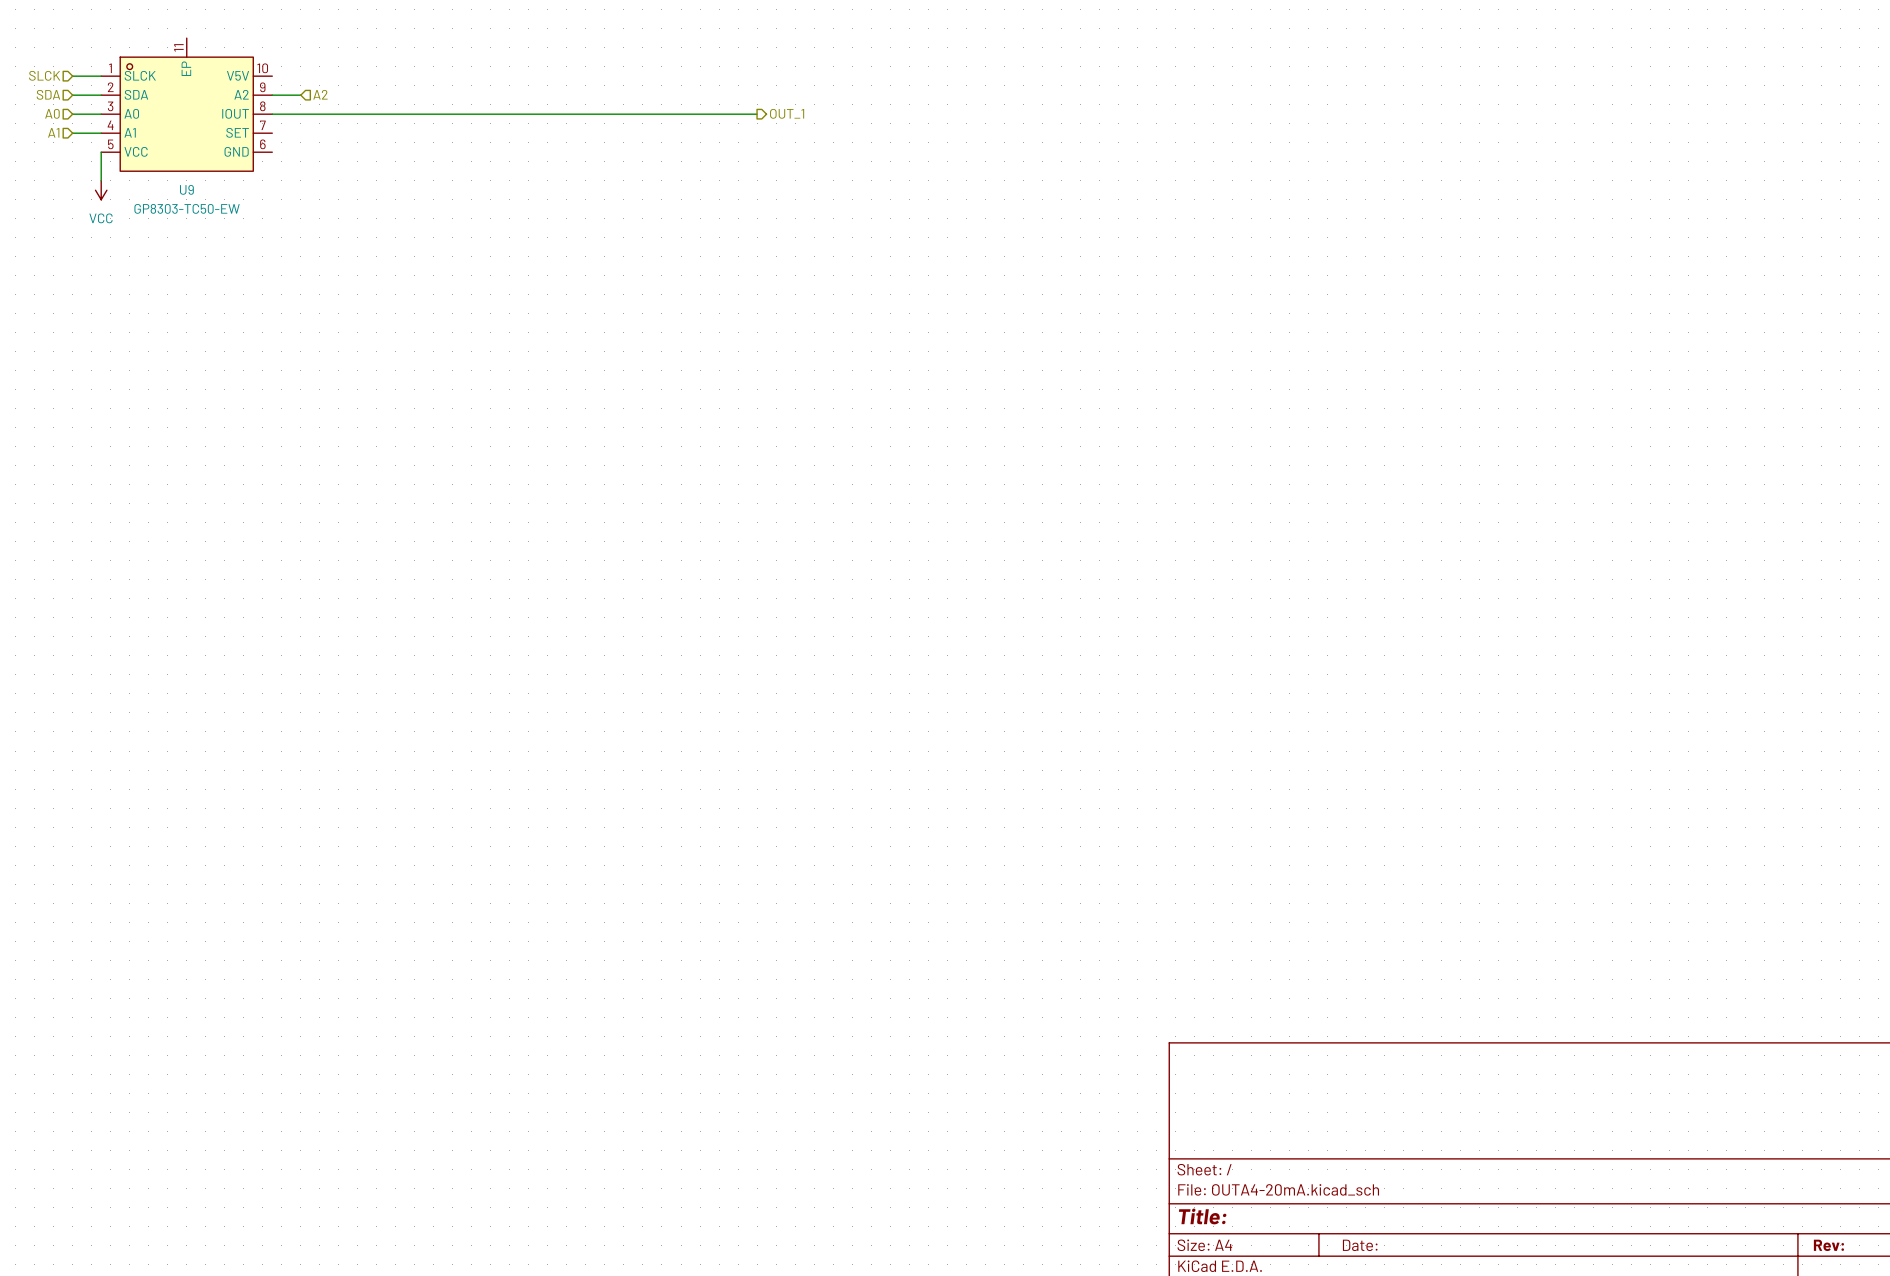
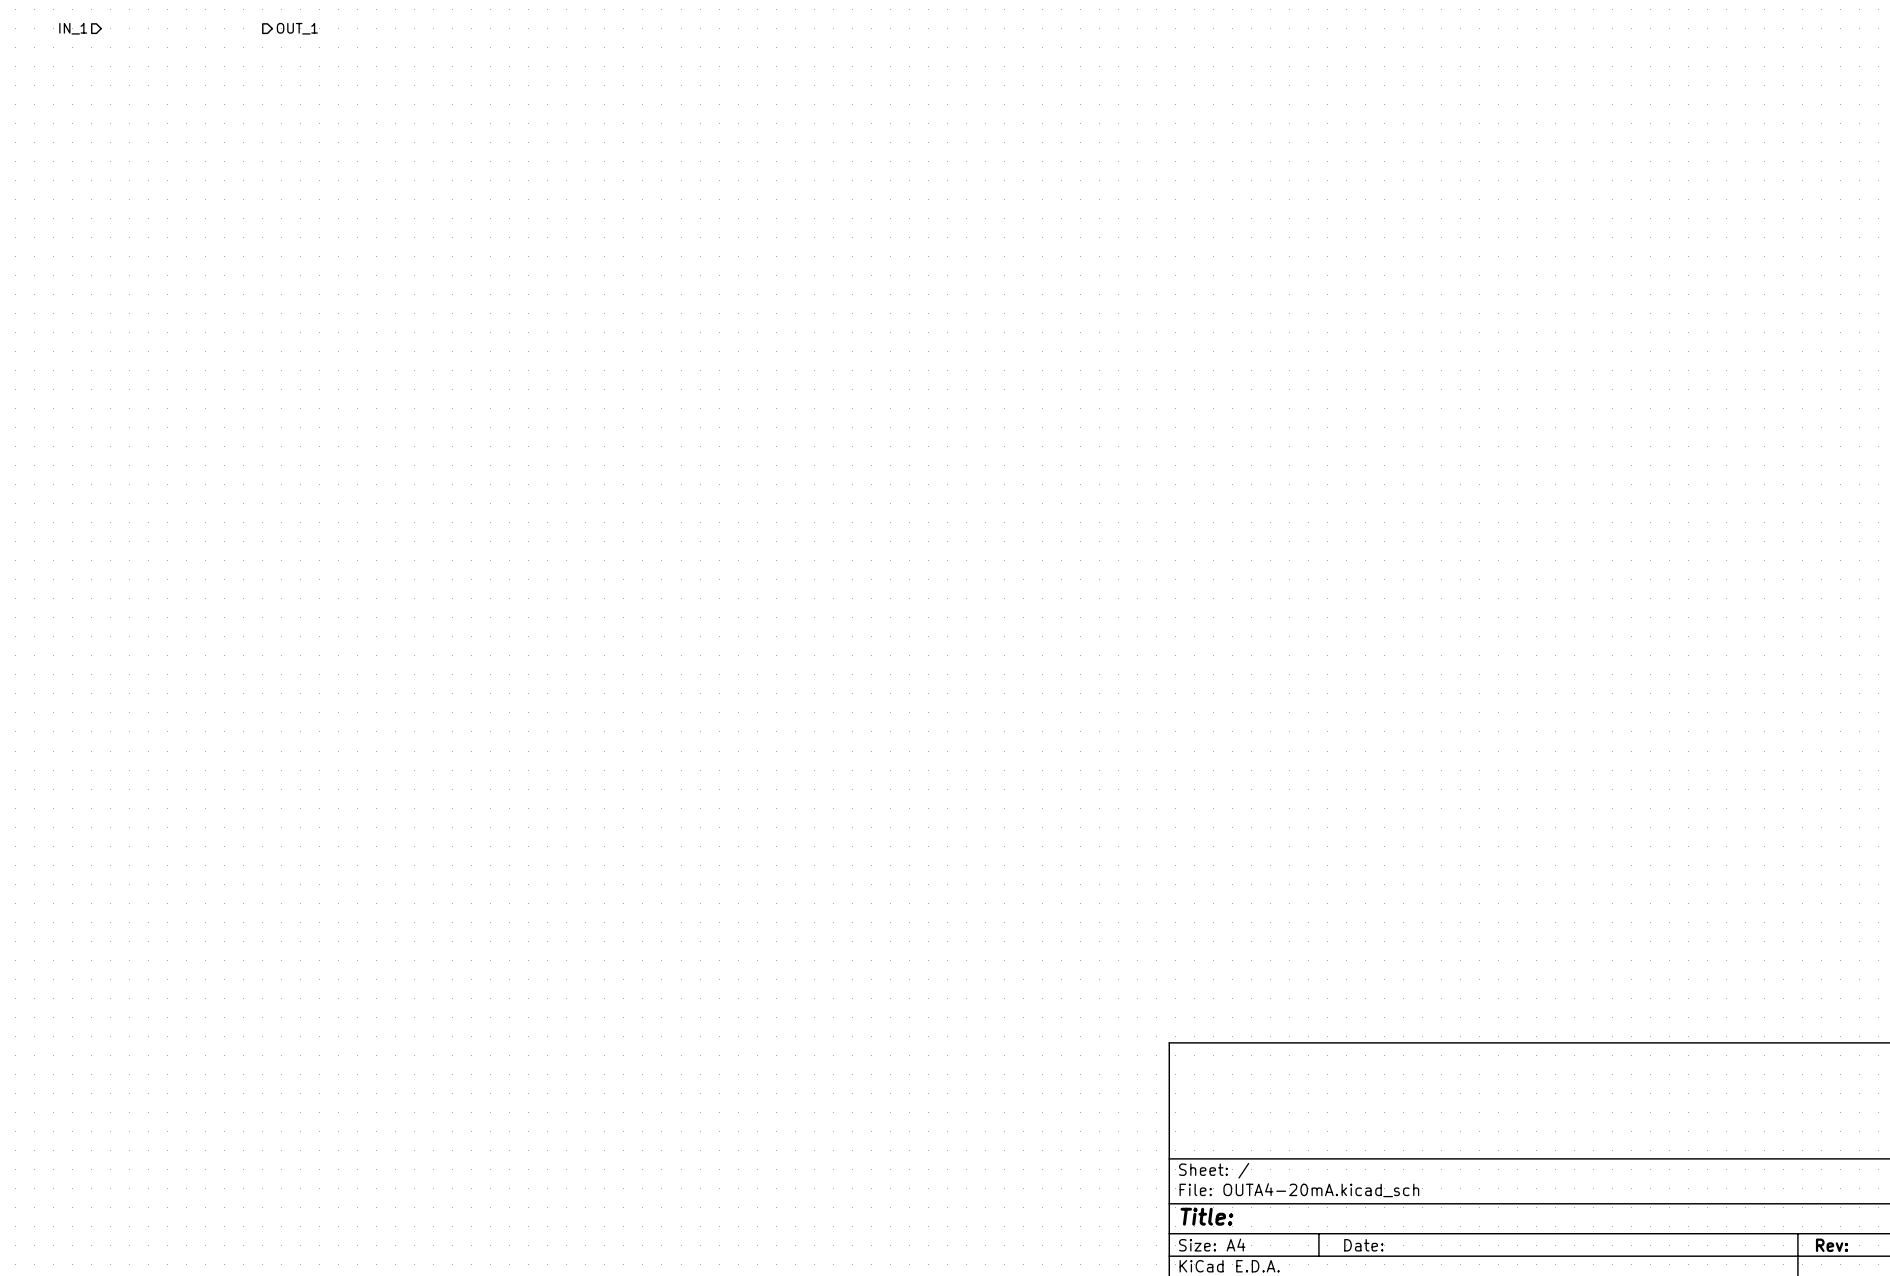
hierarchical label: none -> IN_1 (73, 28)
hierarchical label: none -> OUT_1 (297, 28)
hierarchical label: SLCK (44, 75) -> none
wire: (72, 76) (101, 76) -> none
hierarchical label: SDA (48, 94) -> none
hierarchical label: A2 (320, 94) -> none
wire: (72, 95) (101, 95) -> none
wire: (272, 95) (300, 95) -> none
U9: GP8303-TC50-EW (186, 104) -> none
hierarchical label: A0 (52, 113) -> none
hierarchical label: OUT_1 (787, 113) -> none
wire: (72, 114) (101, 114) -> none
wire: (272, 114) (757, 114) -> none
hierarchical label: A1 (53, 132) -> none
wire: (72, 133) (101, 133) -> none
wire: (101, 152) (101, 180) -> none
power symbol: VCC (101, 190) -> none

